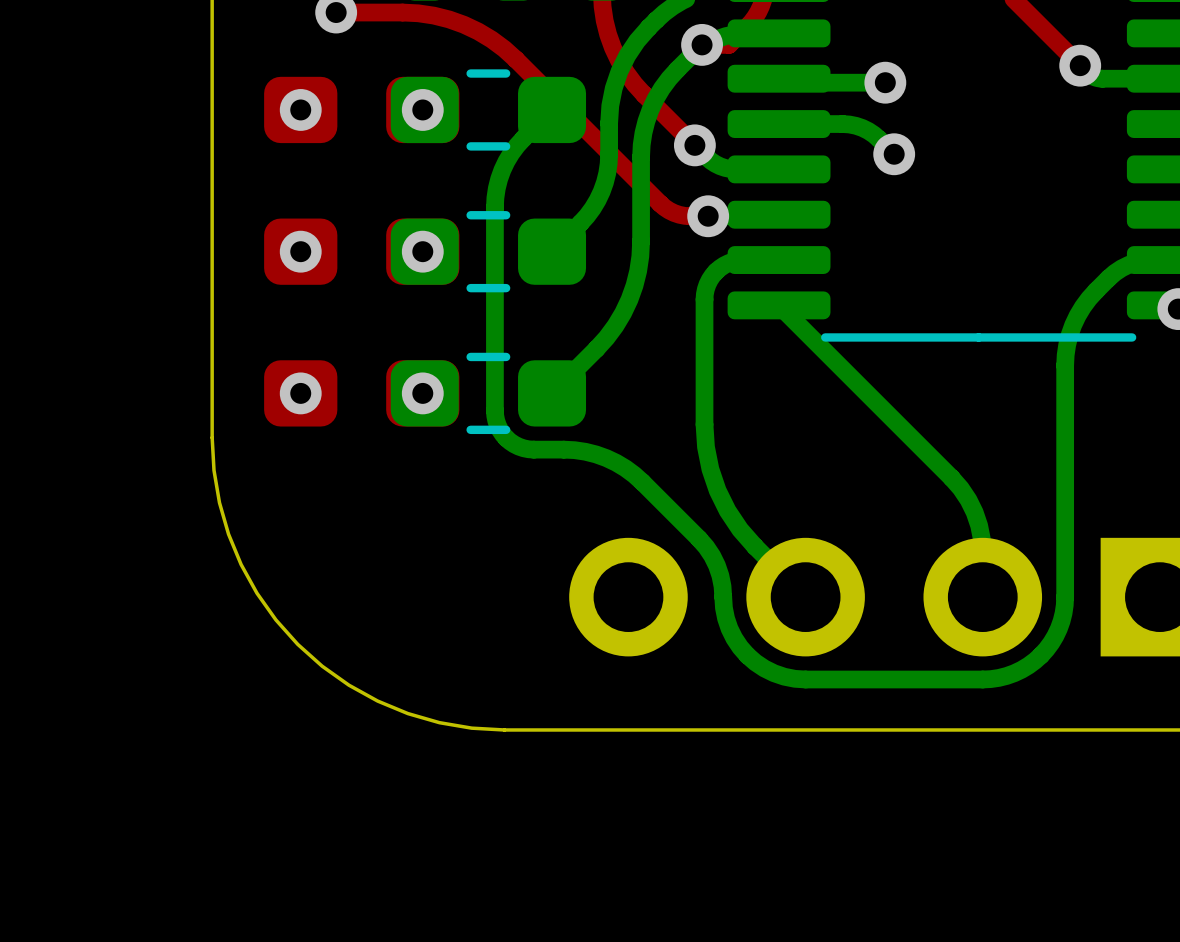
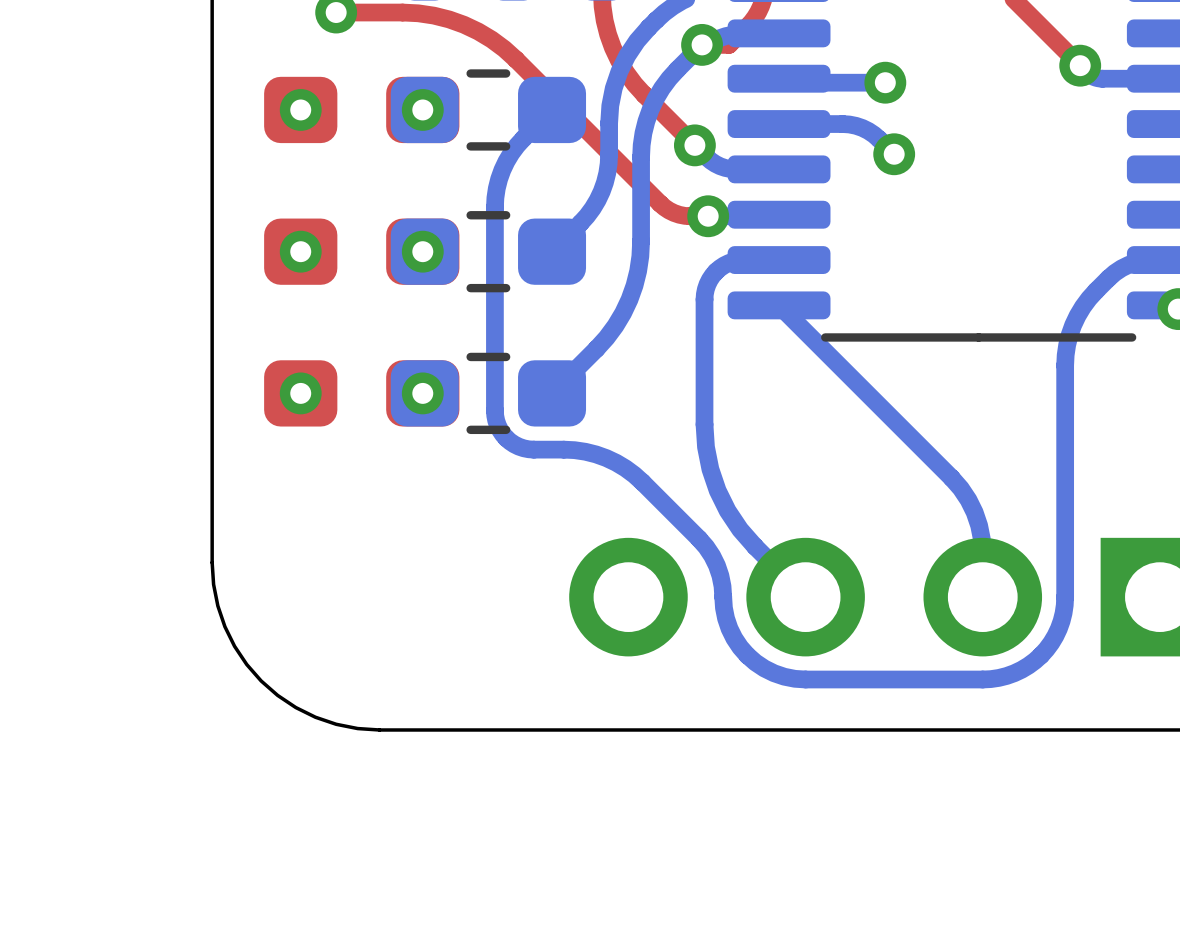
board edge: (212, 437) (214, 470) (219, 502) (228, 534) (241, 564) (256, 593) (275, 619) (297, 644) (322, 666) (348, 685) (377, 701) (407, 713) (439, 722) (471, 728) (504, 729) -> (212, 437) (212, 562) (217, 605) (234, 646) (261, 680) (295, 707) (336, 724) (379, 729) (504, 729)

